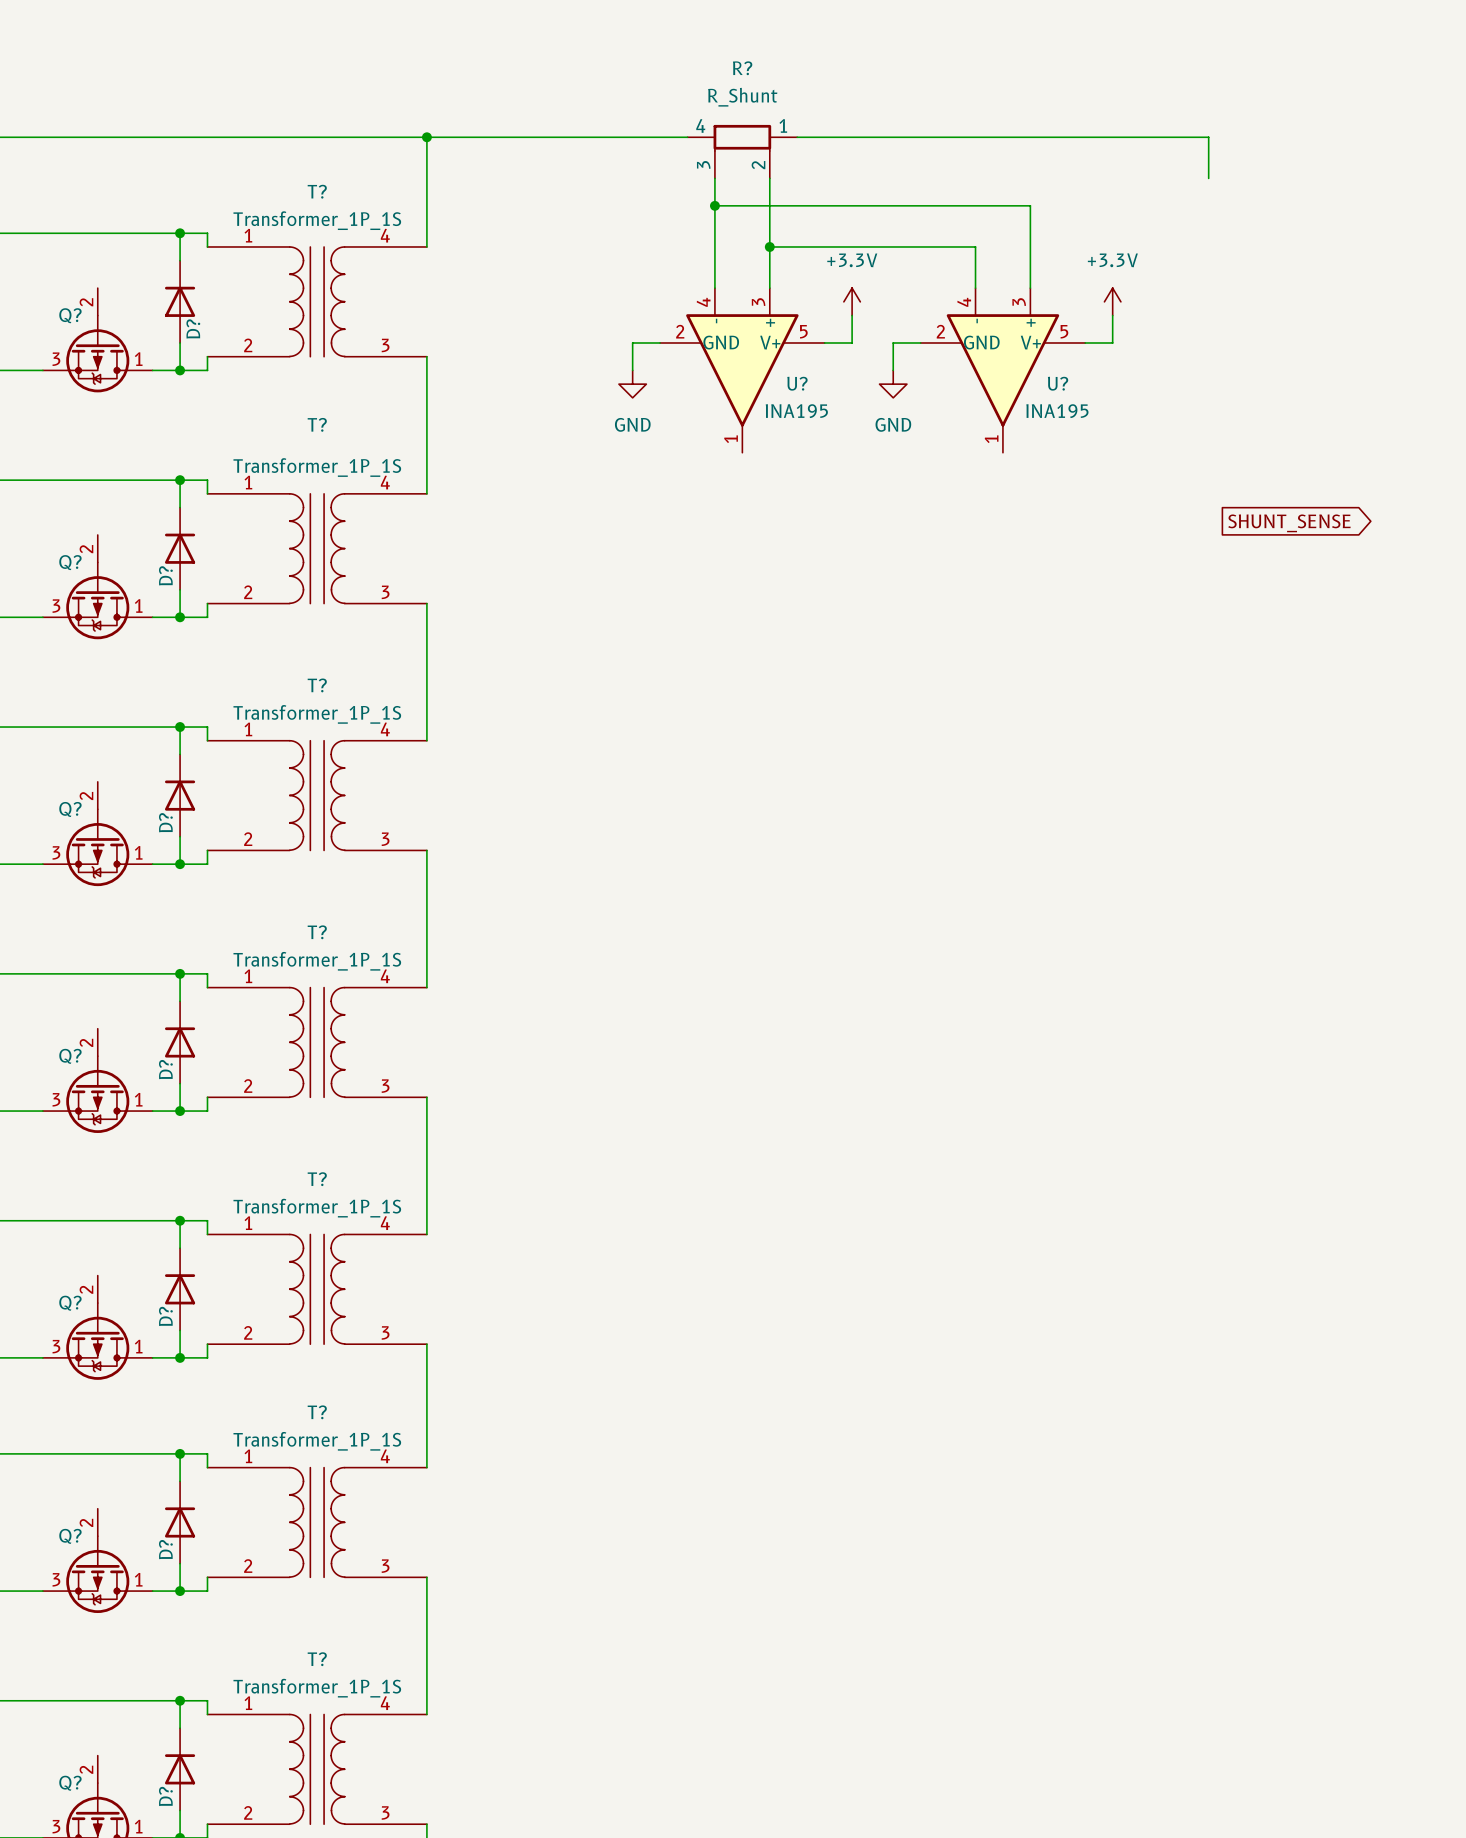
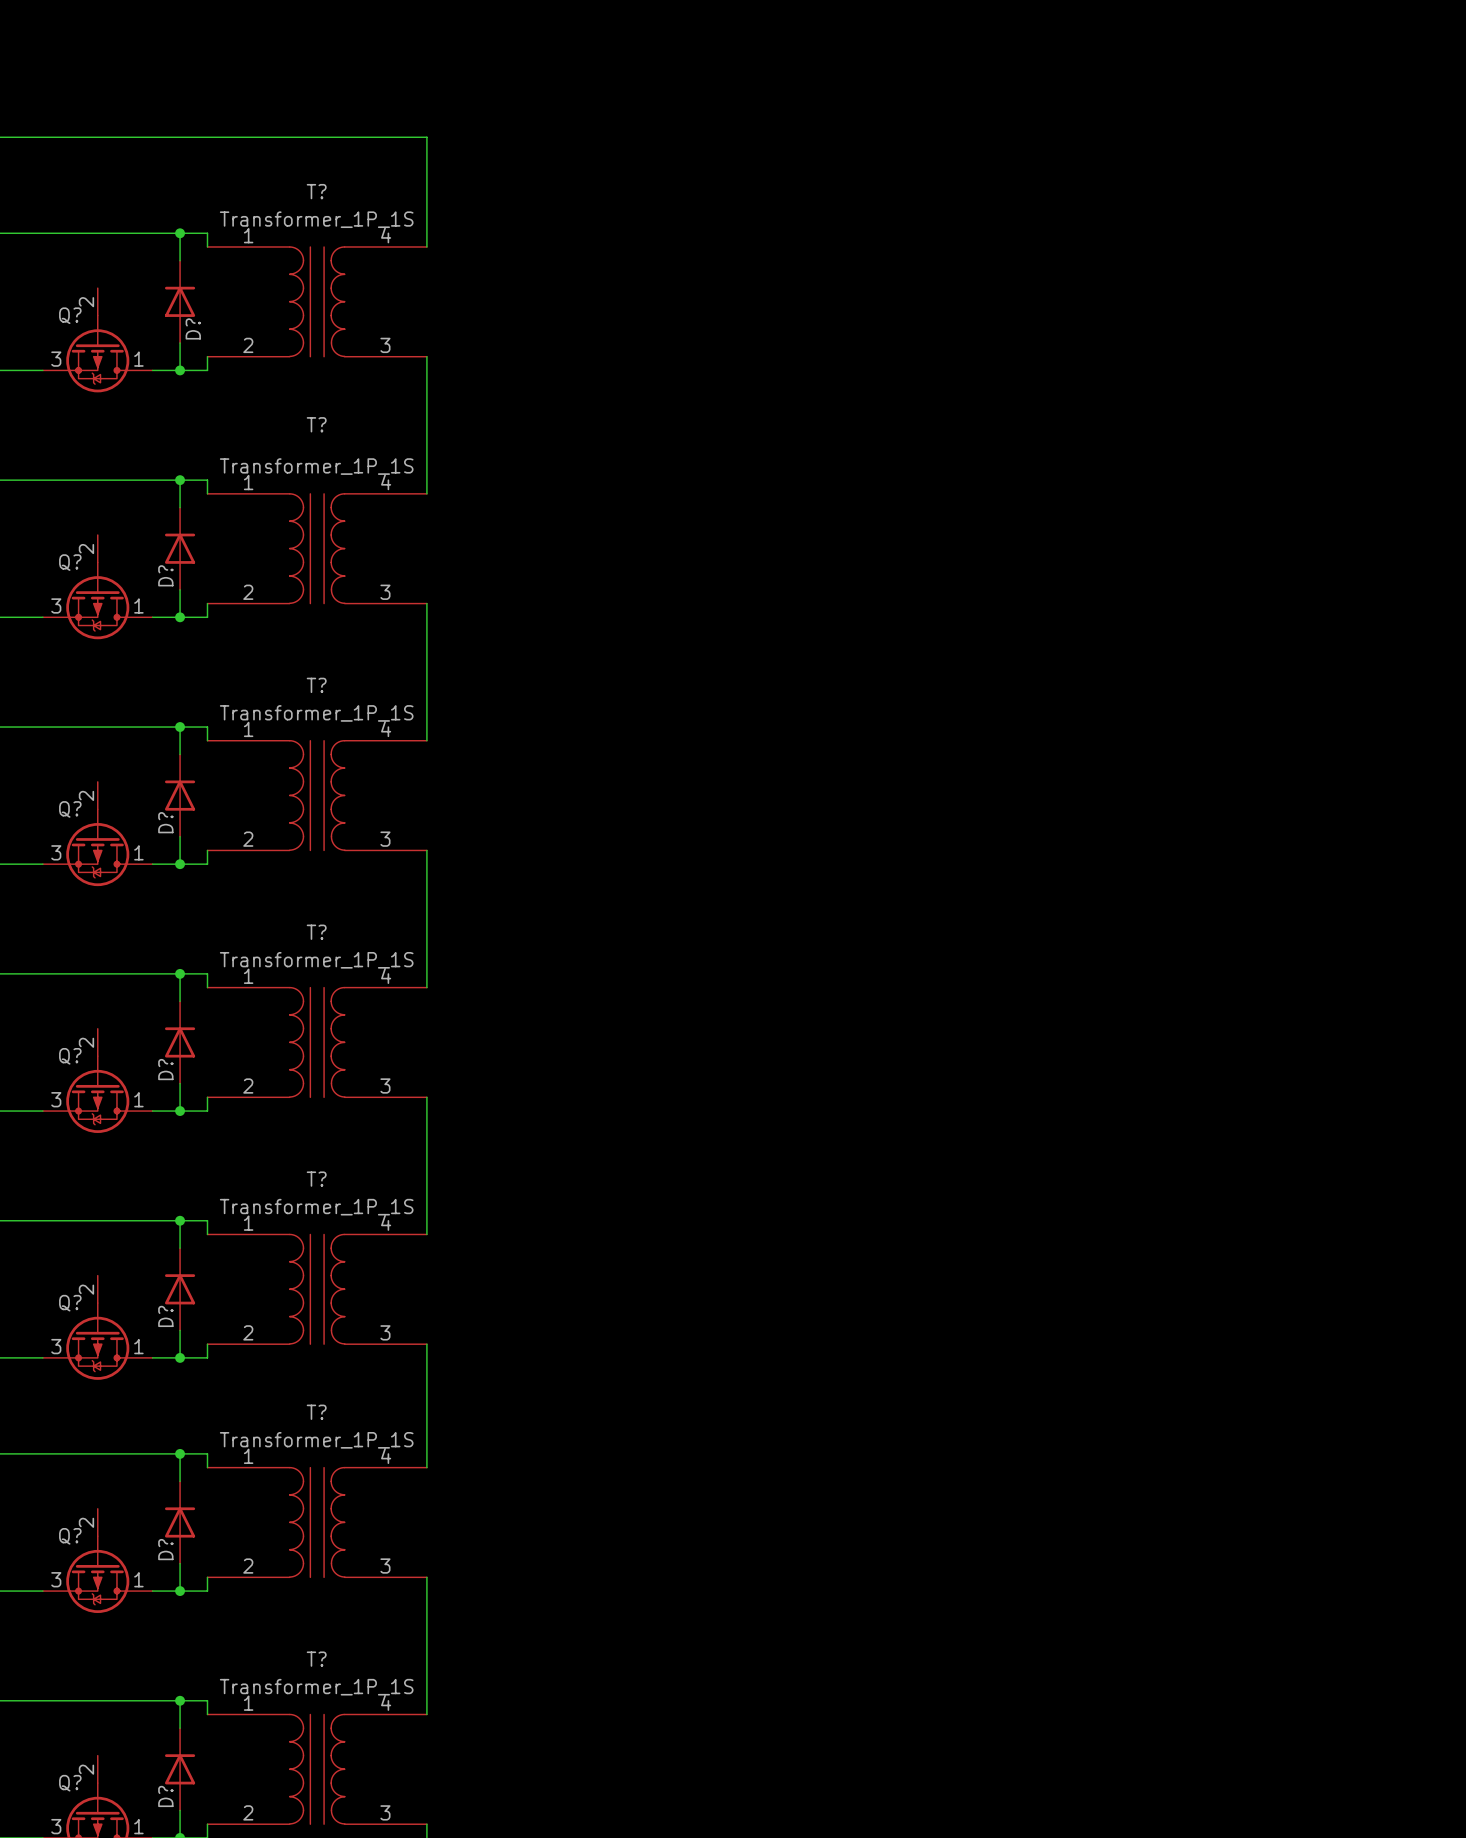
wire: (426, 137) (687, 137) -> none
junction: (426, 137) -> none
wire: (797, 137) (1208, 137) (1208, 178) -> none
R?: R_Shunt (742, 151) -> none
wire: (714, 178) (714, 288) -> none
wire: (769, 178) (769, 288) -> none
wire: (714, 205) (1030, 205) (1030, 288) -> none
junction: (714, 205) -> none
wire: (769, 246) (975, 246) (975, 288) -> none
junction: (769, 246) -> none
power symbol: +3.3V (852, 301) -> none
power symbol: +3.3V (1112, 301) -> none
wire: (852, 315) (852, 342) (824, 342) -> none
wire: (1112, 315) (1112, 342) (1085, 342) -> none
wire: (660, 342) (632, 342) (632, 370) -> none
wire: (920, 342) (893, 342) (893, 370) -> none
U?: INA195 (742, 370) -> none
U?: INA195 (1002, 370) -> none
power symbol: GND (632, 384) -> none
power symbol: GND (893, 384) -> none
global label: SHUNT_SENSE (1289, 523) -> none

